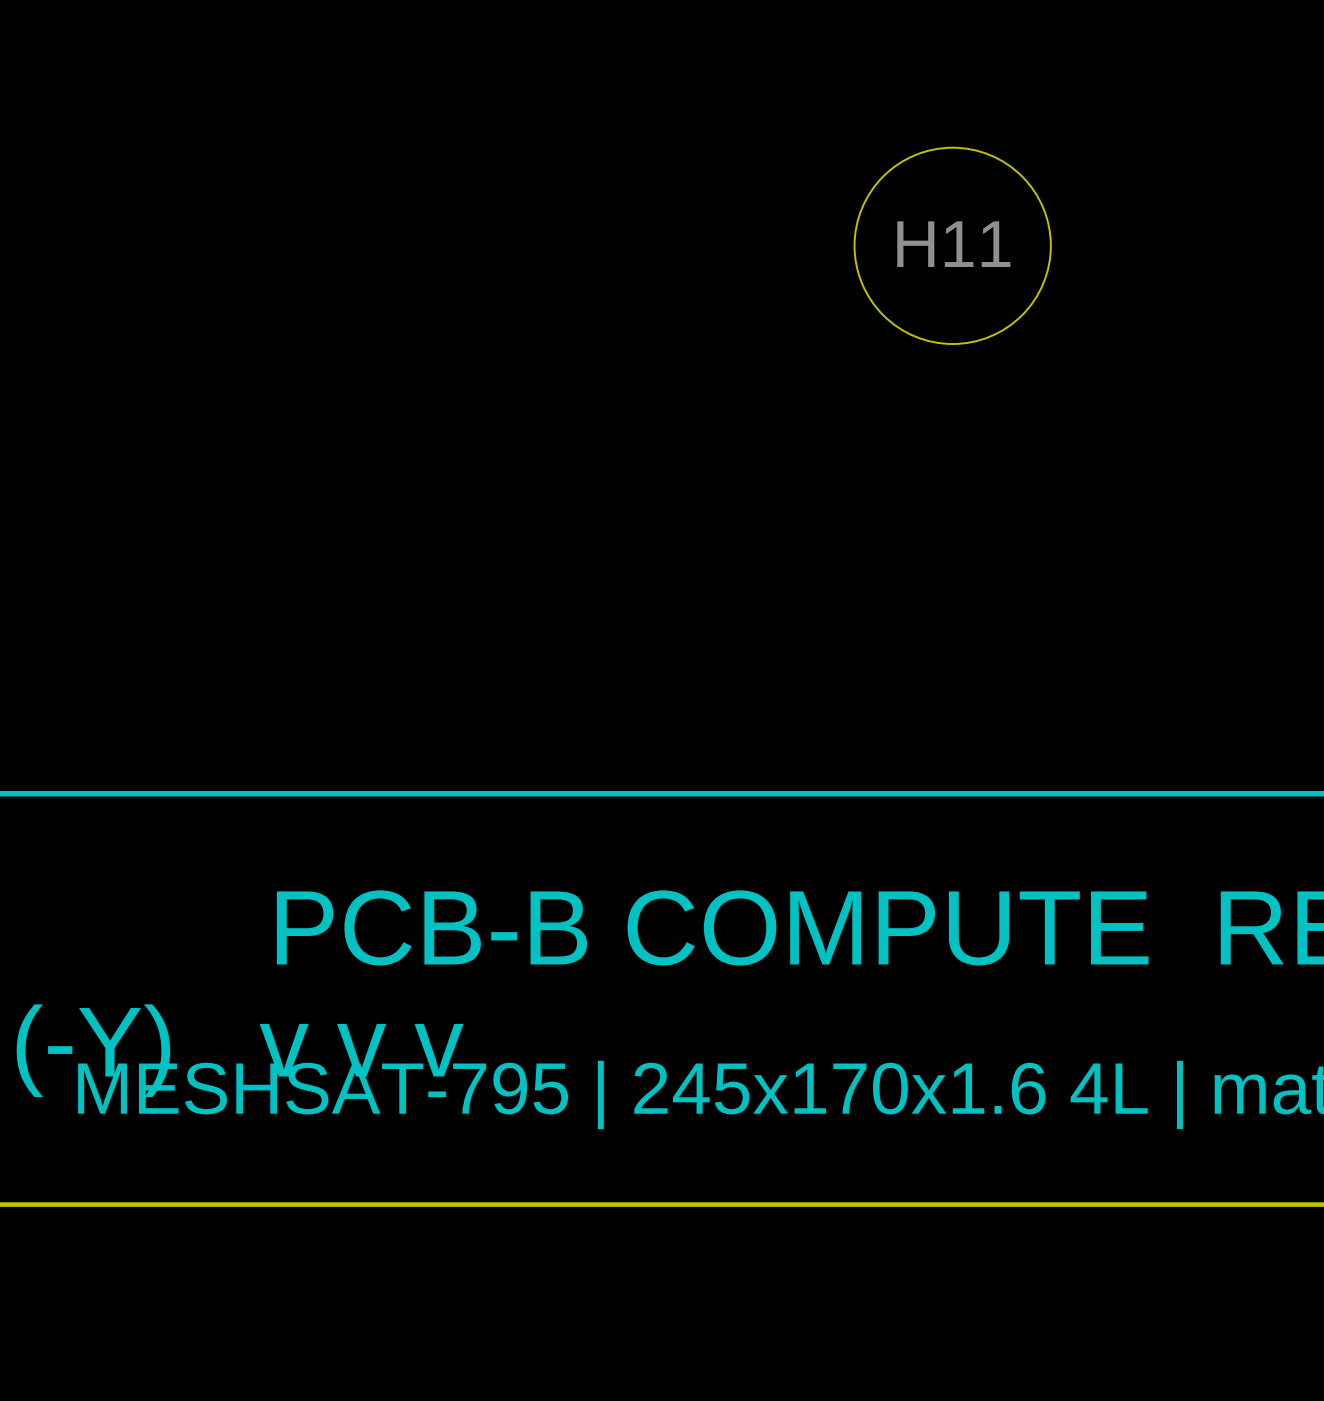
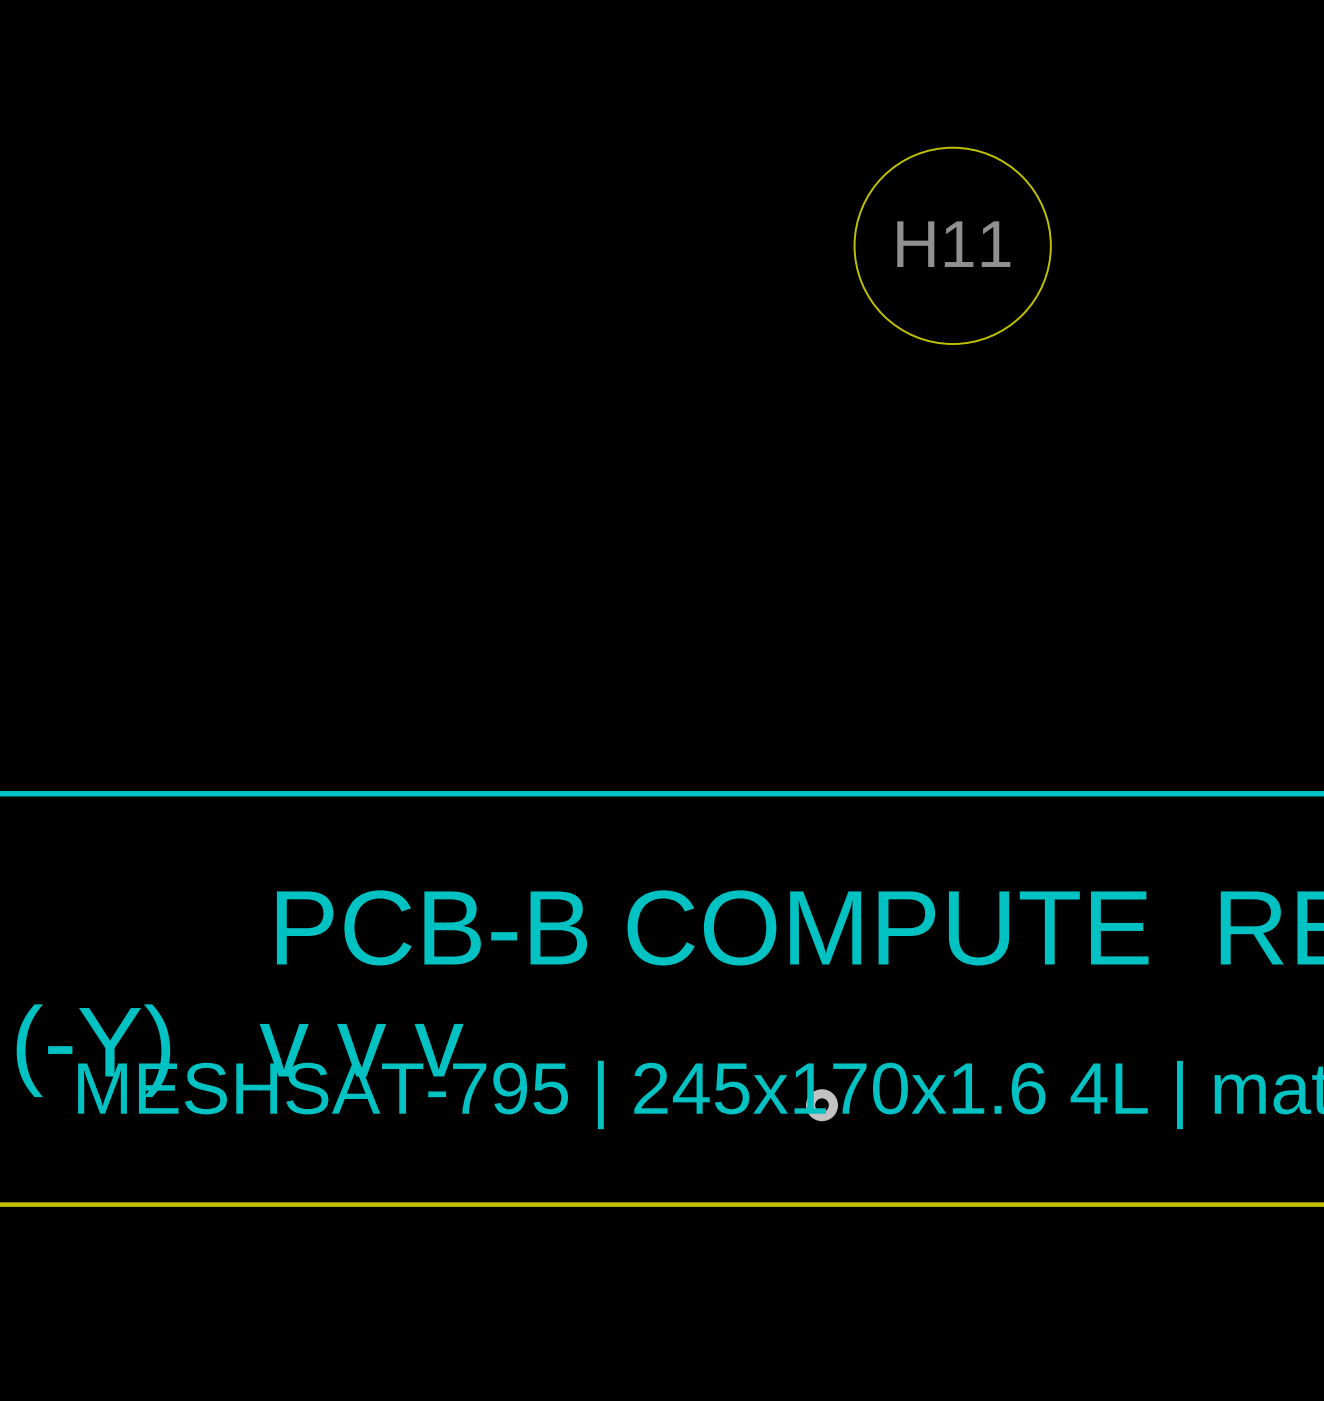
via: none -> (822, 1105)

